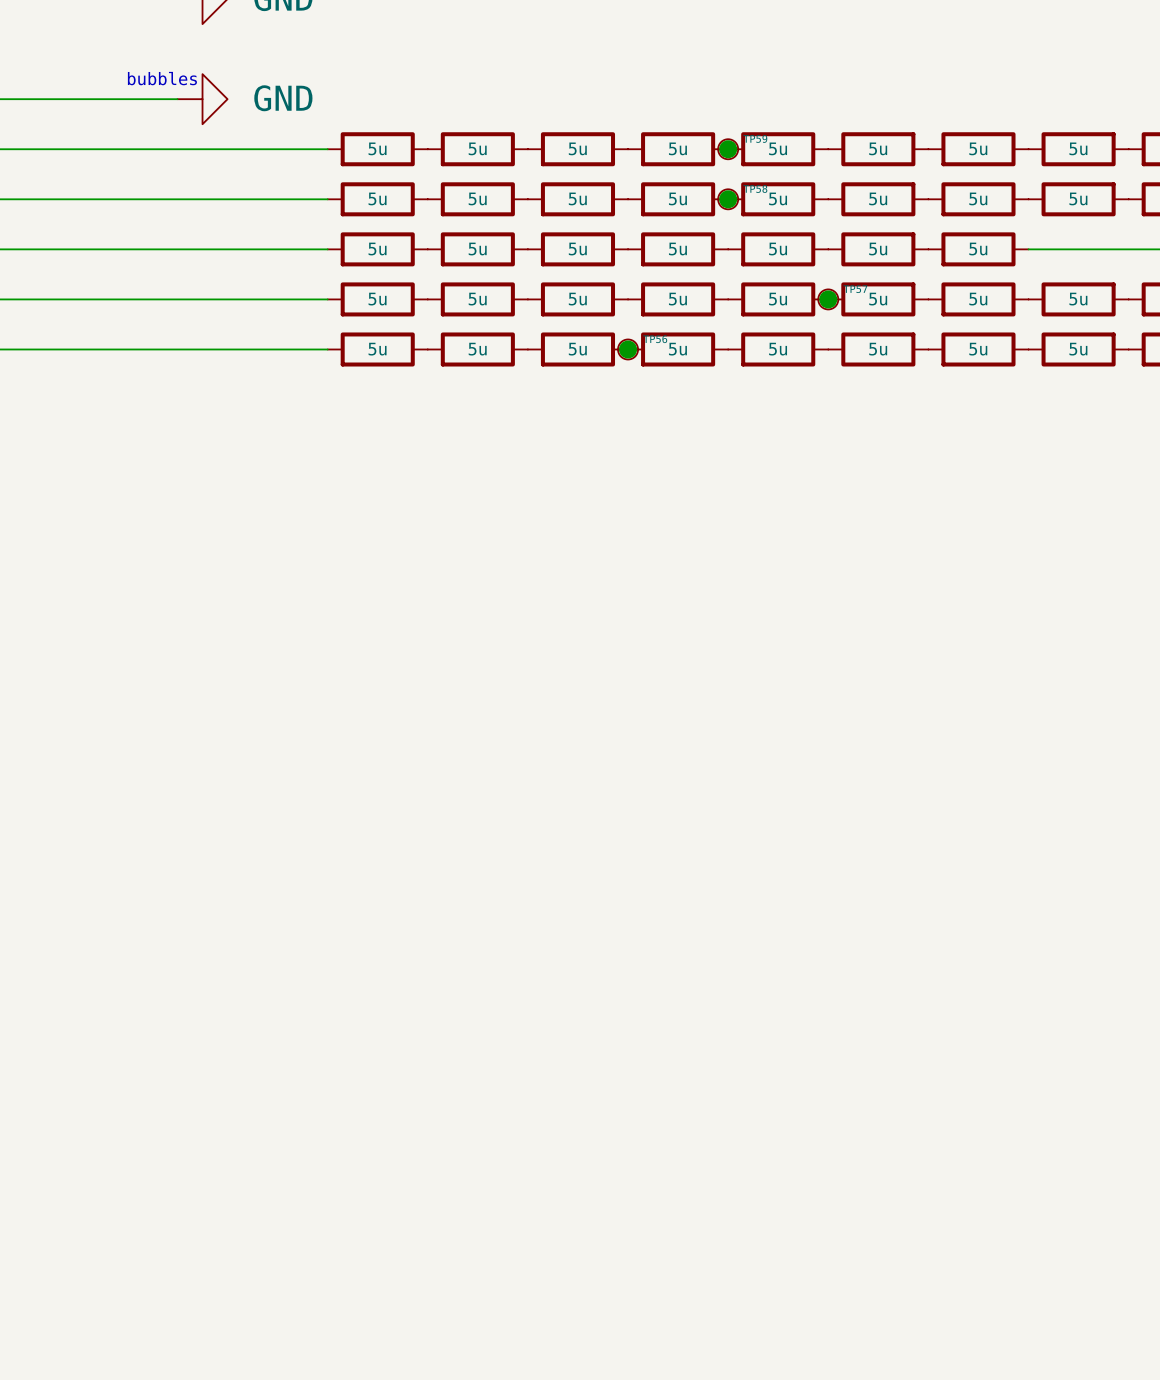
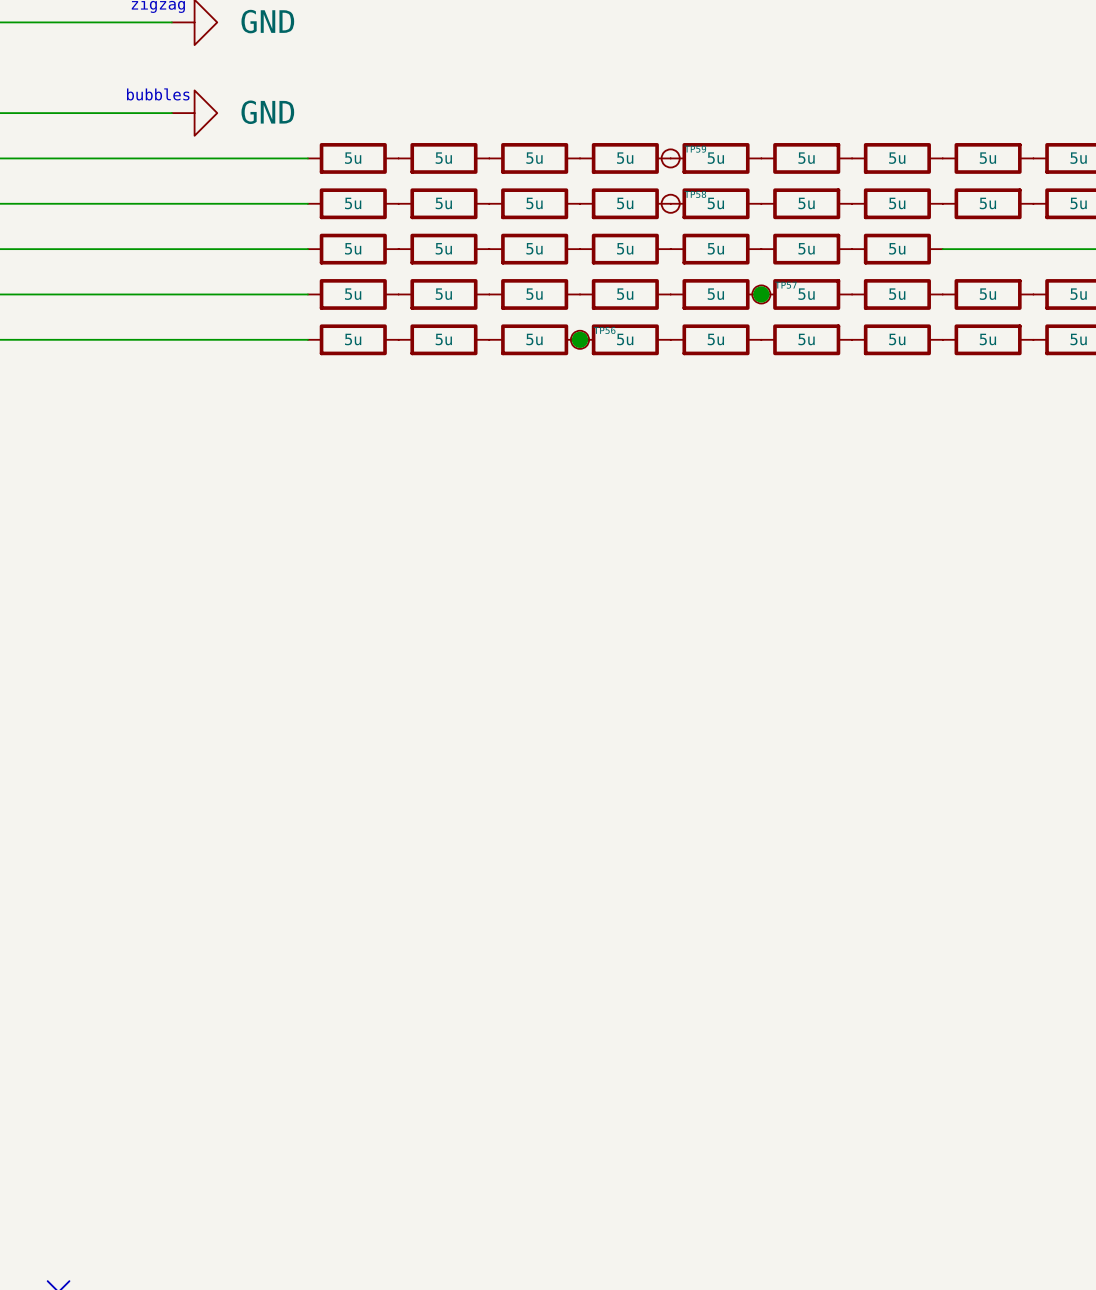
junction: (728, 149) -> none
junction: (728, 199) -> none

